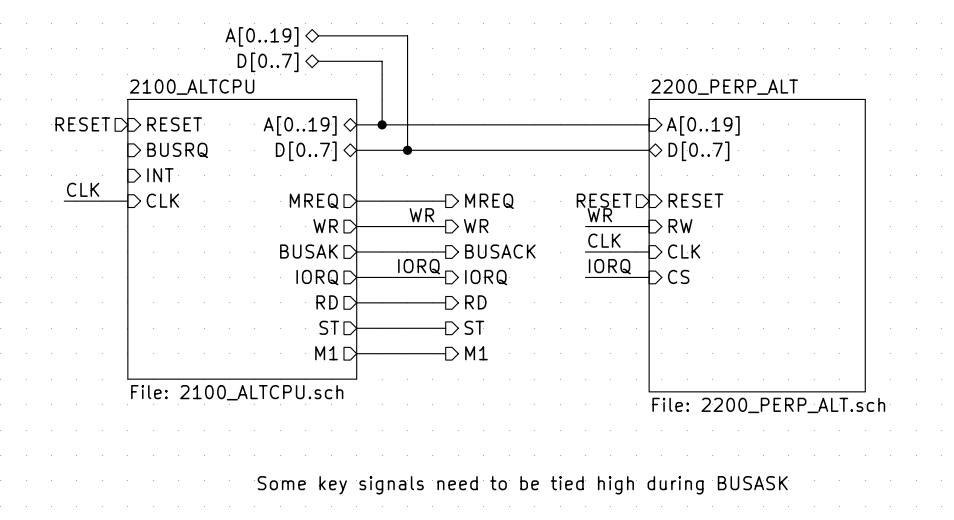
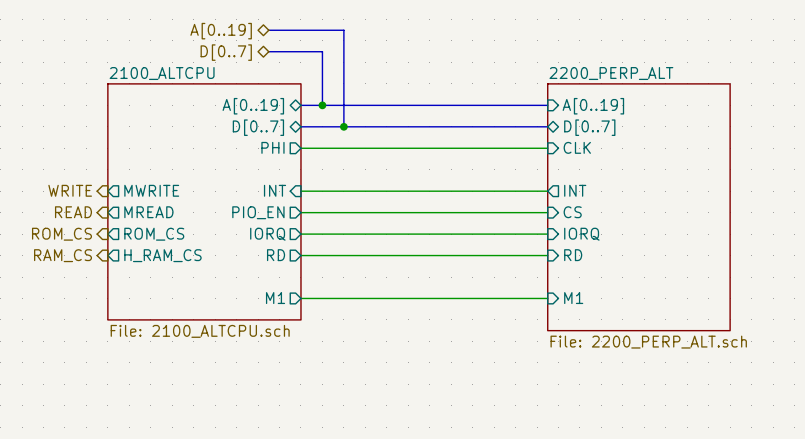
hierarchical label: RESET (82, 124) -> none
sheet pin: RESET (174, 124) -> none
sheet pin: BUSRQ (177, 150) -> none
sheet pin: INT (160, 175) -> none
sheet pin: none -> PHI (272, 147)
wire: none -> (300, 148) (547, 148)
sheet pin: none -> CLK (577, 147)
label: CLK (83, 189) -> none
sheet pin: CLK (162, 200) -> none
hierarchical label: RESET (604, 200) -> none
sheet pin: RESET (695, 200) -> none
wire: (64, 201) (127, 201) -> none
sheet pin: MREQ (314, 201) -> none
wire: (356, 201) (445, 201) -> none
hierarchical label: MREQ (489, 201) -> none
label: WR (421, 215) -> none
label: WR (599, 215) -> none
hierarchical label: none -> WRITE (70, 190)
sheet pin: none -> MWRITE (151, 190)
sheet pin shape: output (325, 226) -> input (275, 190)
sheet pin: WR (325, 226) -> INT (275, 190)
wire: none -> (376, 191) (494, 191)
hierarchical label: WR (476, 226) -> none
sheet pin shape: input (680, 226) -> output (575, 190)
sheet pin: RW (680, 226) -> INT (575, 190)
label: CLK (604, 240) -> none
hierarchical label: none -> READ (73, 212)
sheet pin: none -> MREAD (148, 212)
sheet pin: BUSAK (308, 251) -> PIO_EN (258, 212)
hierarchical label: BUSACK (500, 251) -> none
sheet pin: CLK (684, 251) -> CS (572, 212)
wire: none -> (376, 212) (494, 212)
label: IORQ (419, 266) -> none
label: IORQ (609, 266) -> none
sheet pin: CS (678, 276) -> IORQ (581, 234)
hierarchical label: none -> ROM_CS (61, 234)
sheet pin: none -> ROM_CS (154, 234)
wire: none -> (376, 234) (494, 234)
hierarchical label: IORQ (486, 277) -> none
hierarchical label: none -> RAM_CS (63, 255)
sheet pin: none -> H_RAM_CS (162, 255)
wire: none -> (376, 255) (547, 255)
hierarchical label: RD (475, 302) -> none
sheet pin: none -> RD (573, 255)
sheet pin: ST (329, 327) -> none
hierarchical label: ST (474, 327) -> none
wire: (356, 328) (445, 328) -> none
wire: none -> (376, 298) (547, 298)
hierarchical label: M1 (476, 353) -> none
sheet pin: none -> M1 (573, 298)
text: Some key signals need to be tied high during BUSASK (522, 485) -> none

